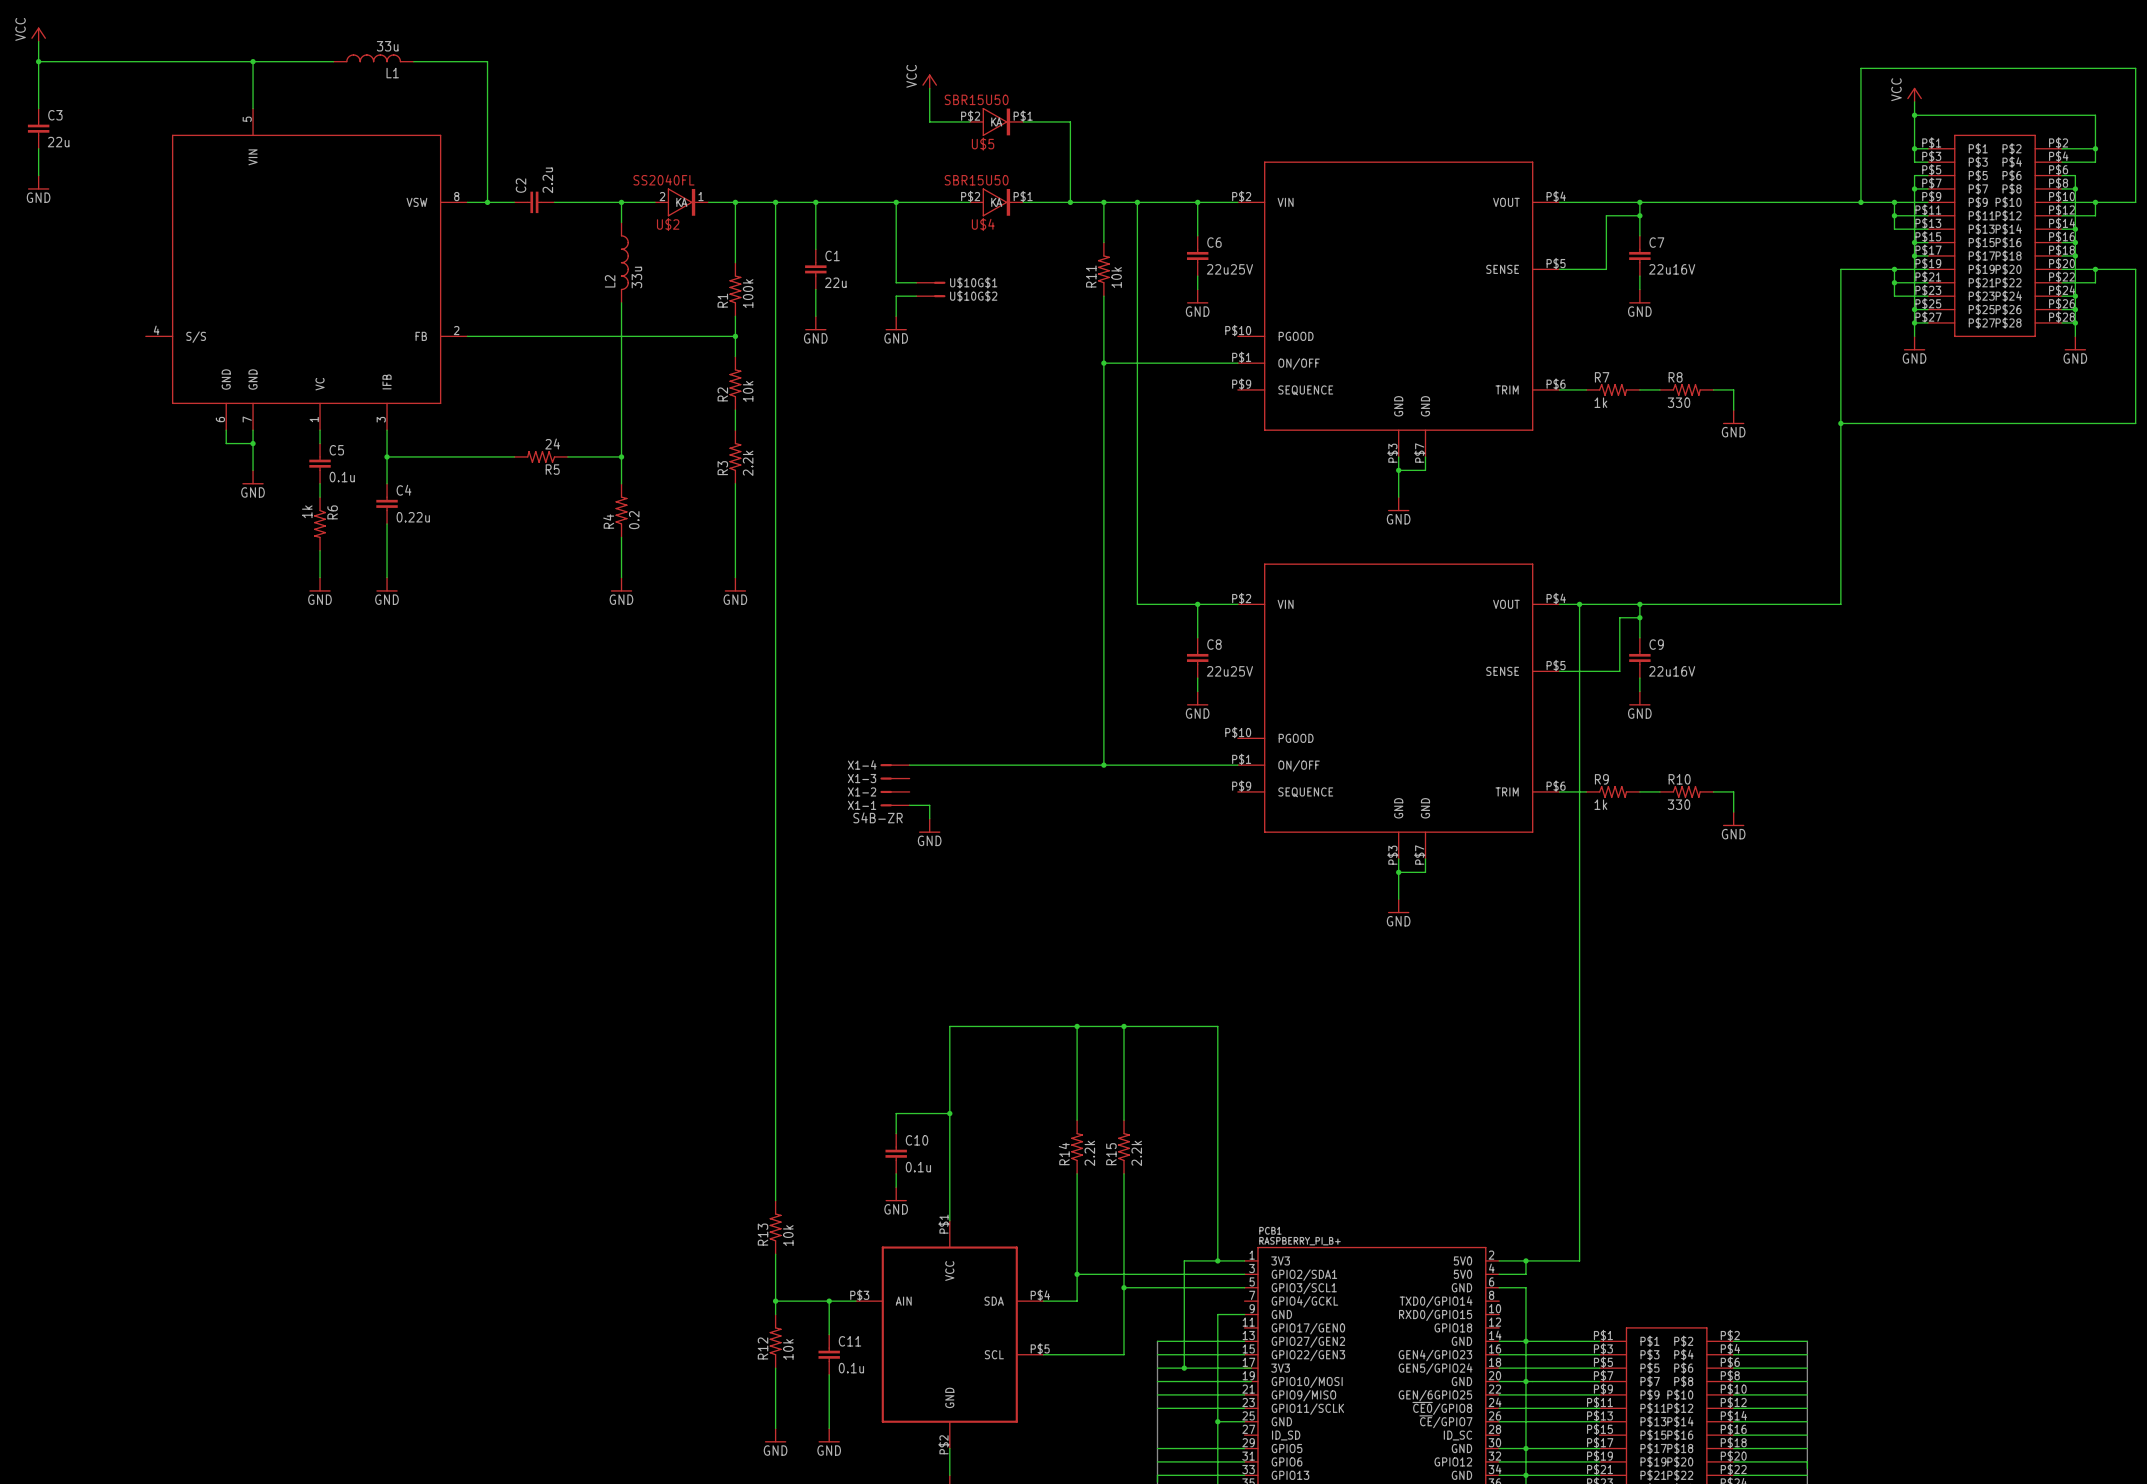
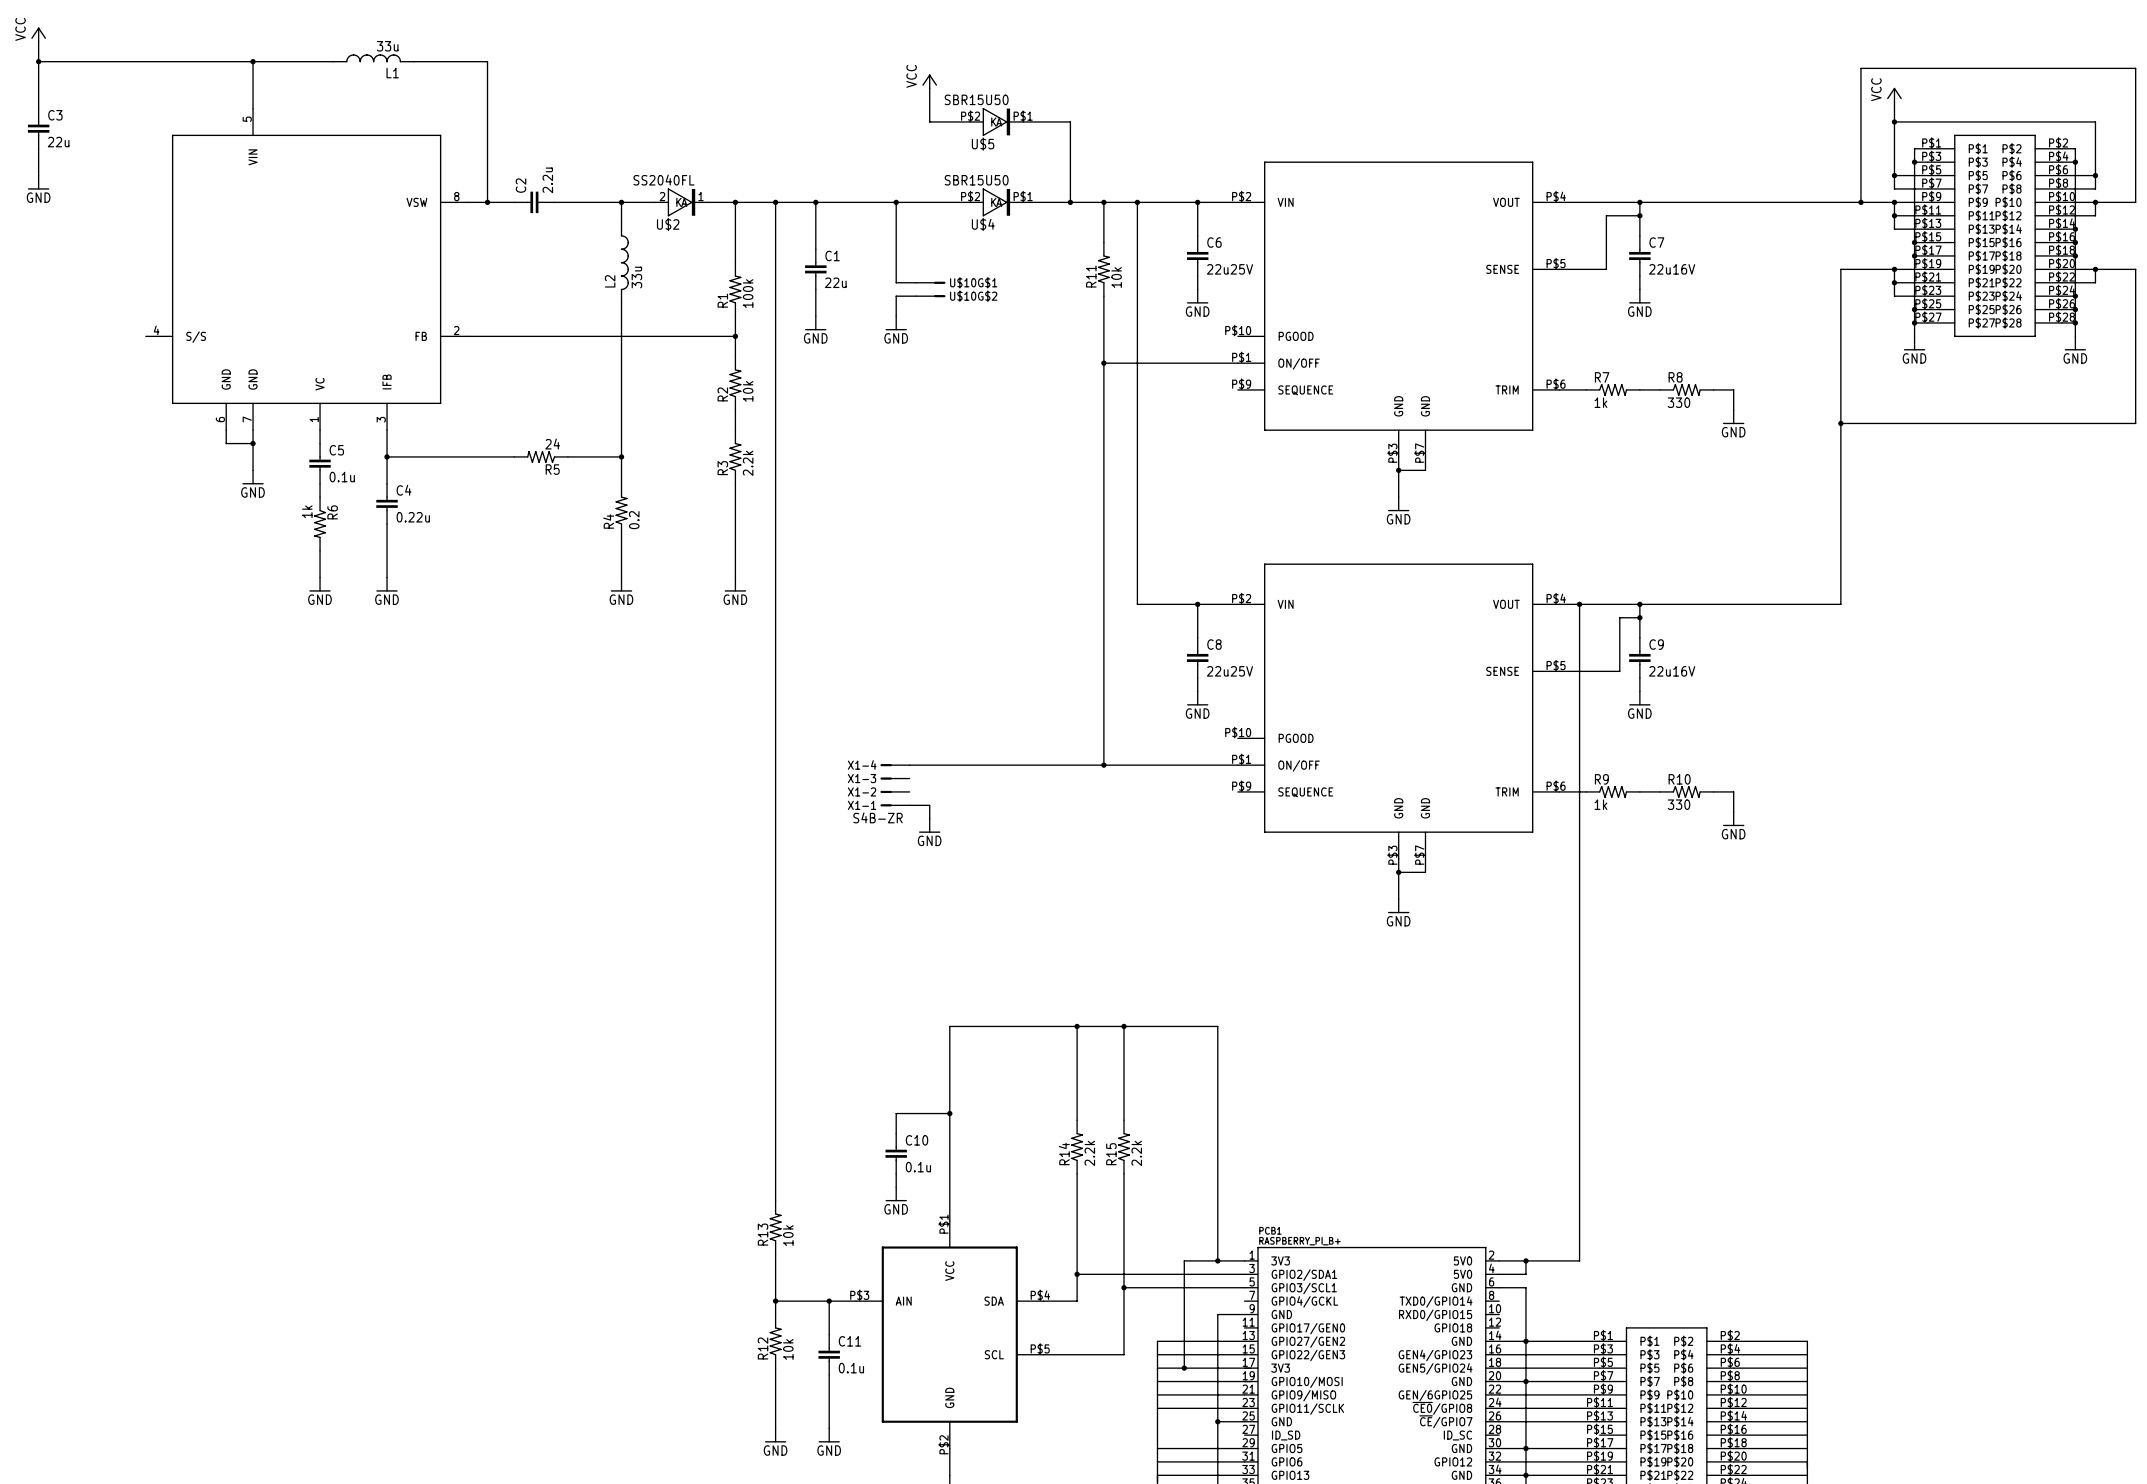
power symbol position: VCC (1914, 94) -> VCC (1894, 94)
wire: none -> (1894, 101) (1894, 188) (1914, 188)
wire: (1914, 101) (1914, 148) -> none
wire: (1914, 115) (2095, 115) (2095, 121) -> (1894, 121) (2095, 121)
junction: (1914, 115) -> none
junction: none -> (1894, 121)
junction: (1914, 148) -> none
wire: (2075, 148) (2095, 148) -> (2075, 148) (2075, 175) (2095, 175)
junction: (2095, 148) -> none
wire: none -> (1914, 162) (1914, 175) (1894, 175)
junction: none -> (1914, 162)
wire: (2075, 162) (2095, 162) -> (2075, 188) (2095, 188) (2095, 162)
junction: none -> (2075, 162)
junction: none -> (1894, 175)
junction: none -> (2095, 175)
junction: (1914, 188) -> none
junction: (2075, 188) -> none

